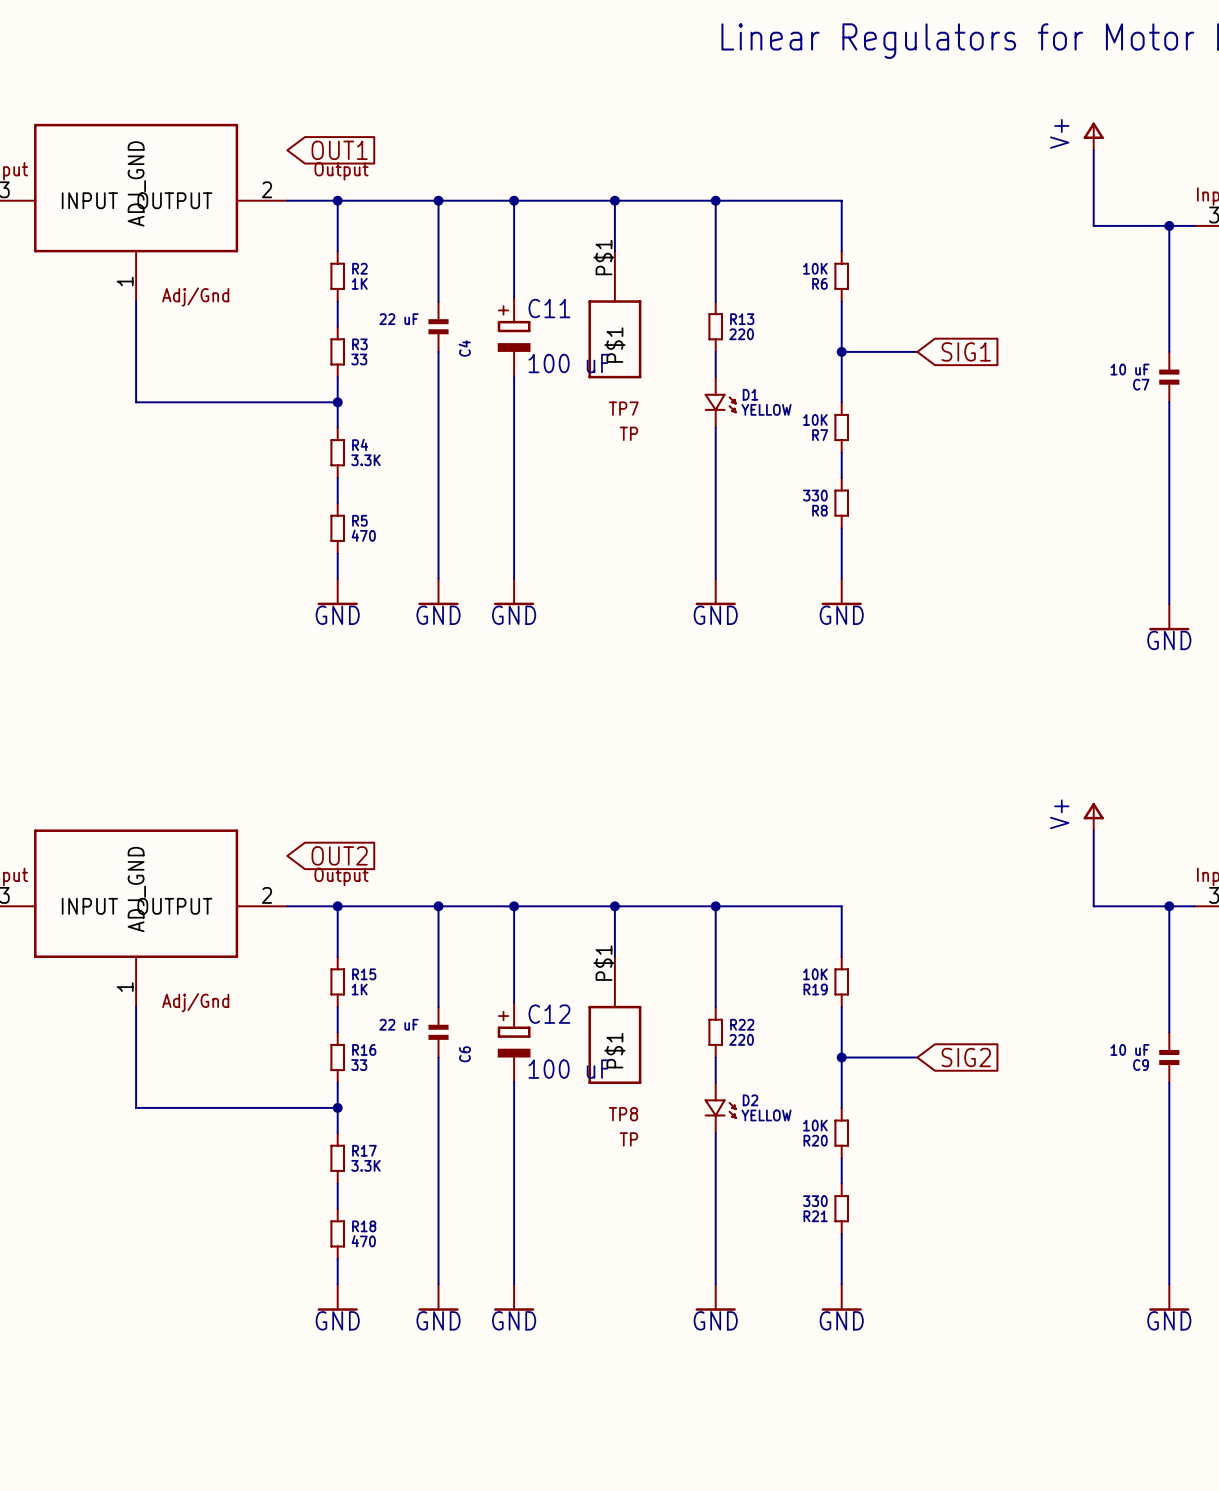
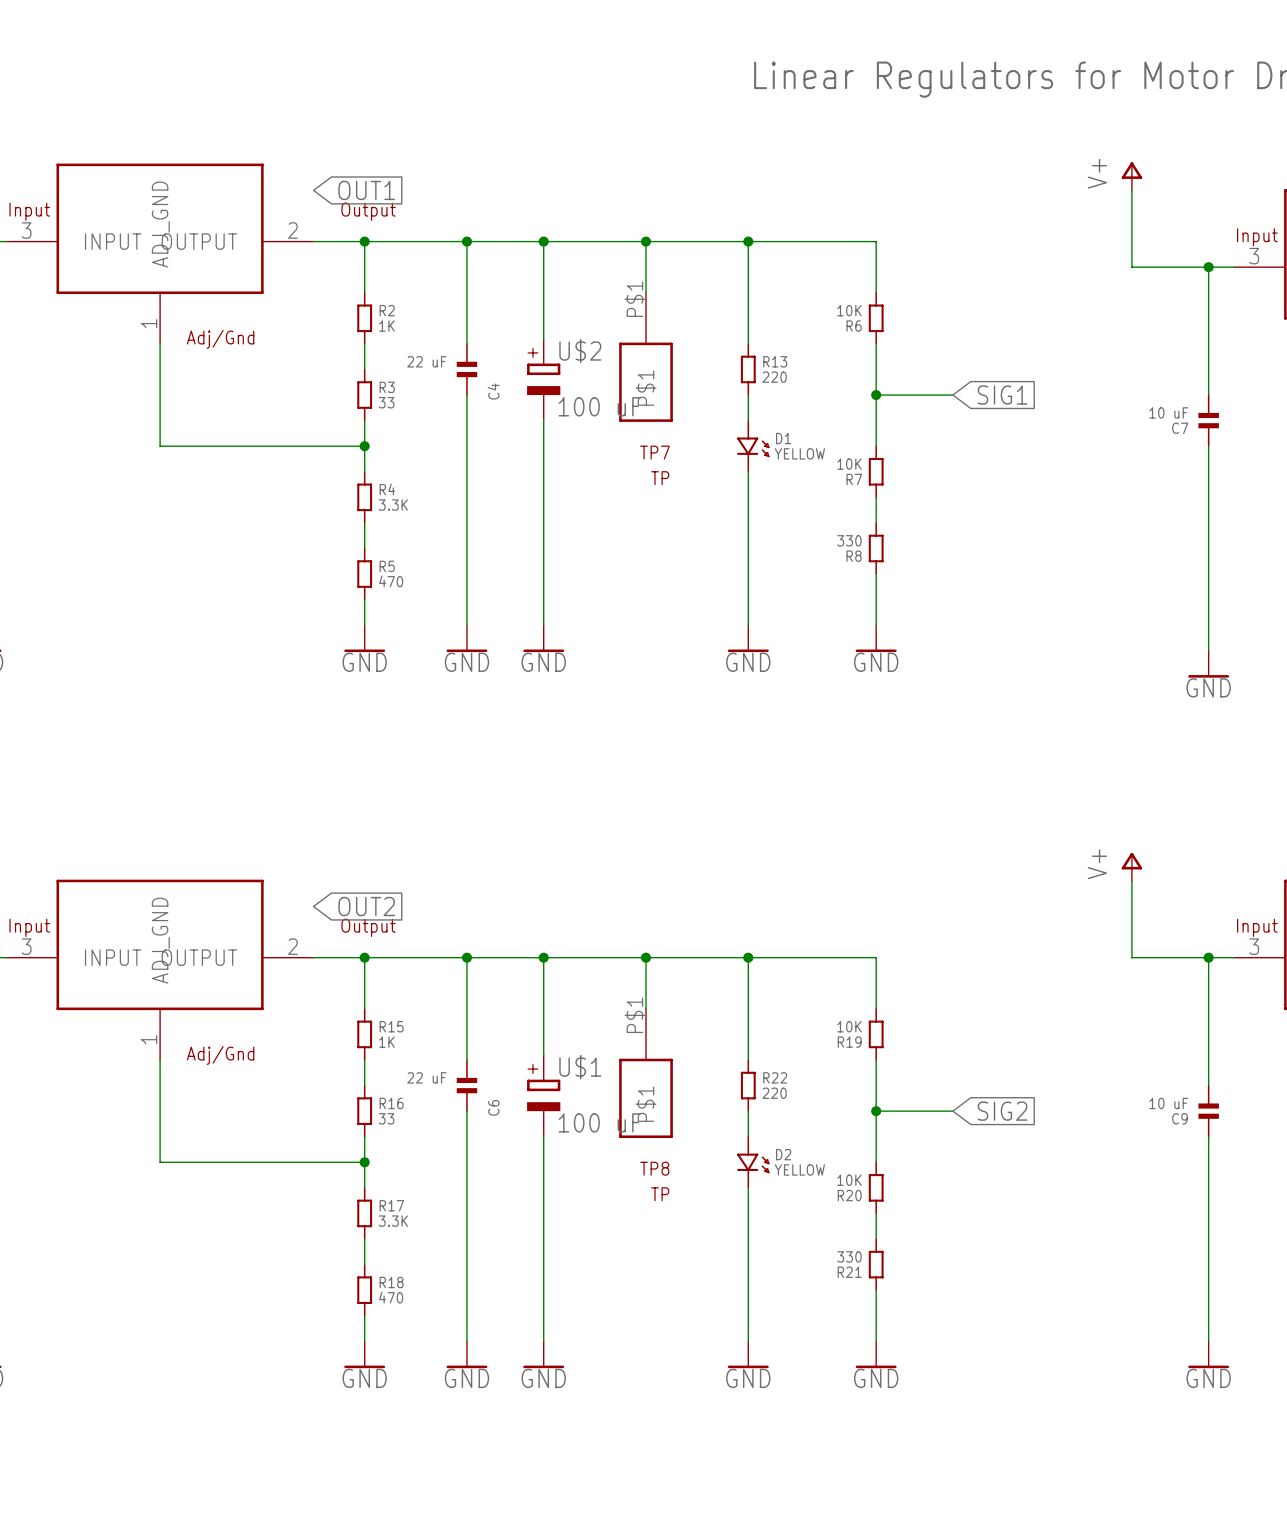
C11 name: C11 (549, 308) -> U$2 (580, 351)
C12 name: C12 (549, 1014) -> U$1 (580, 1067)

